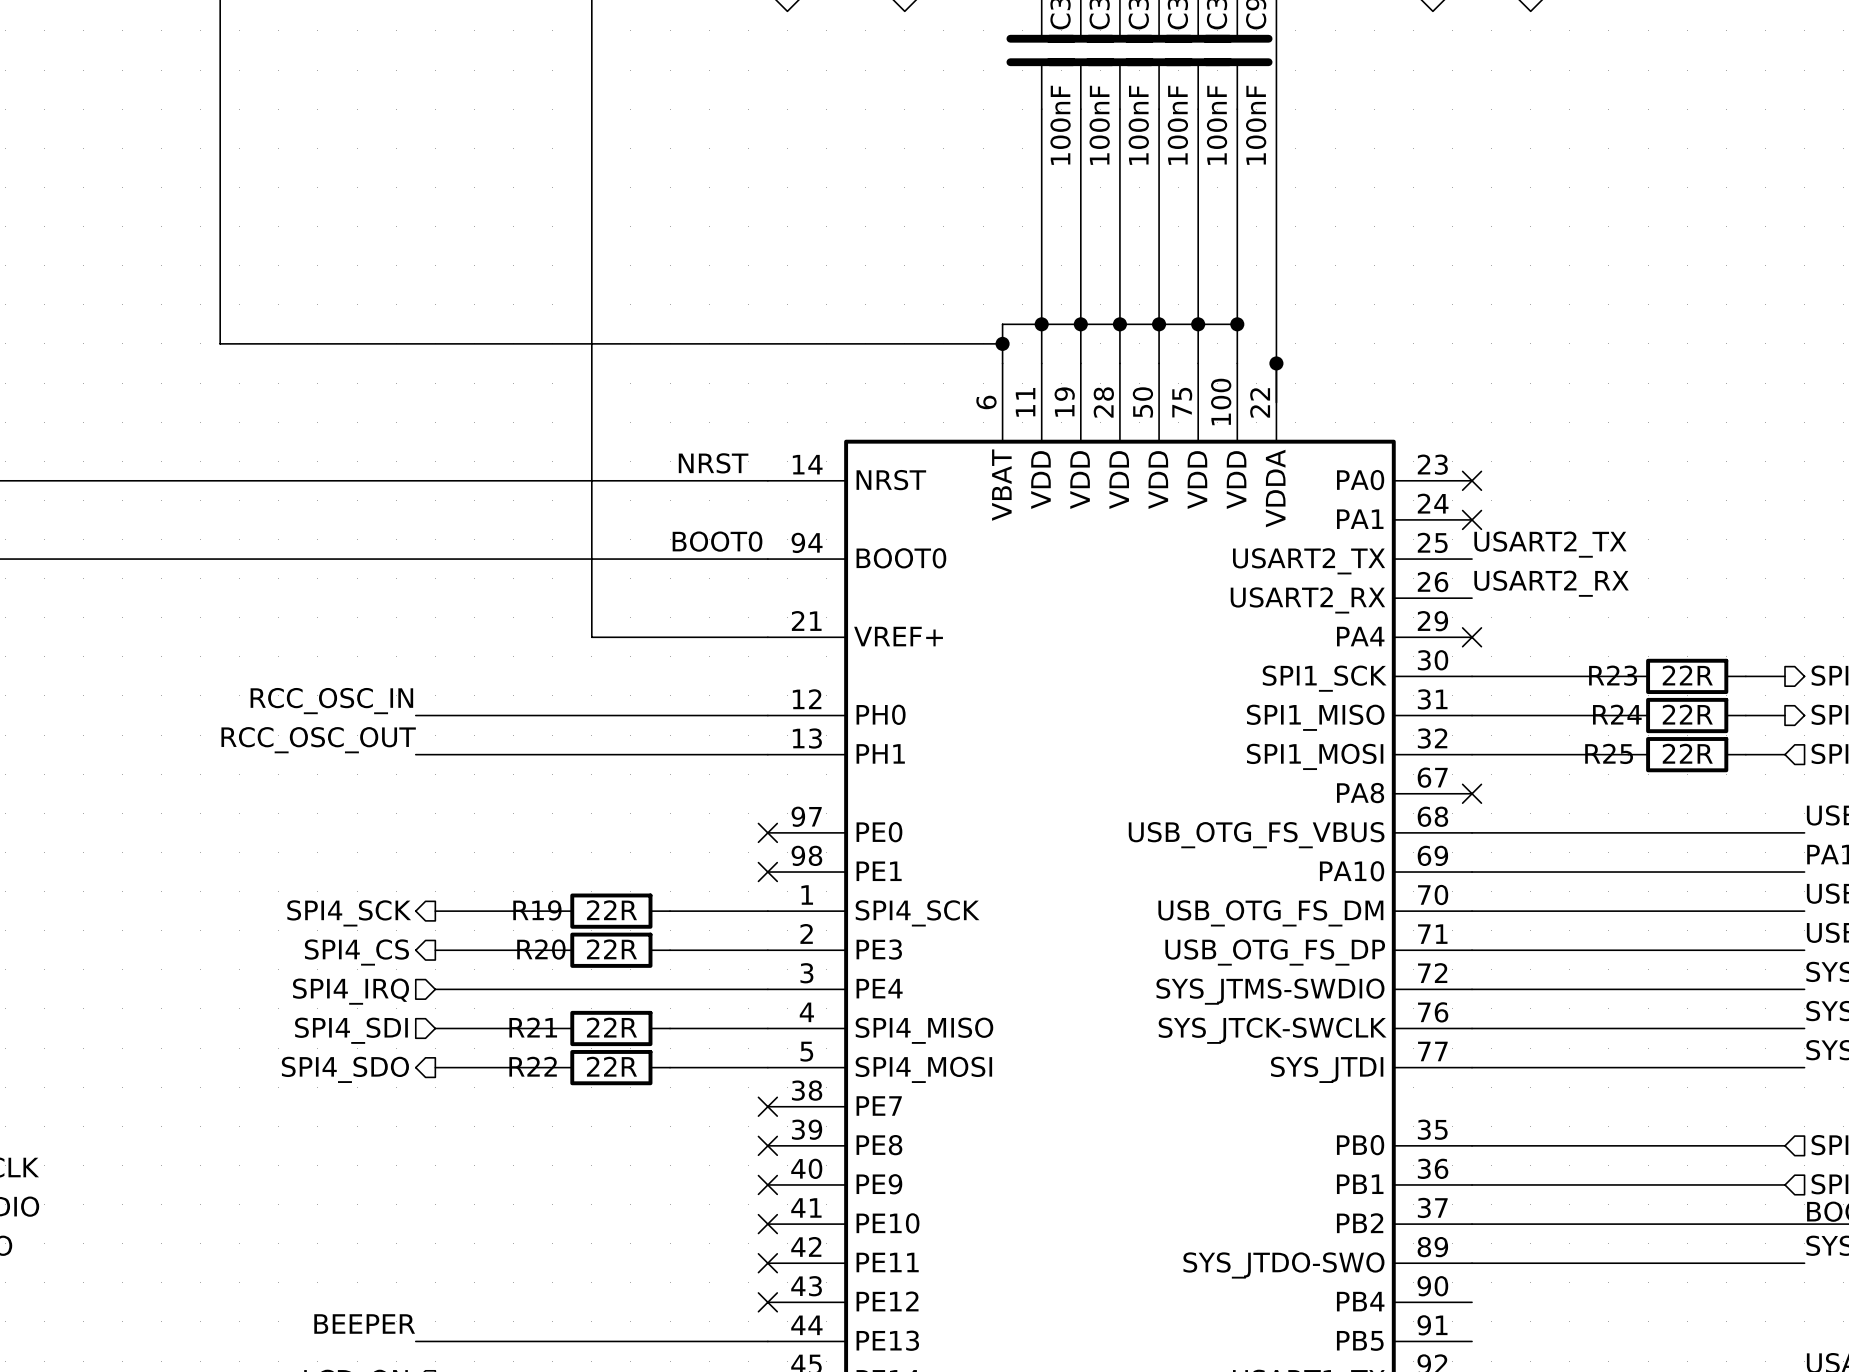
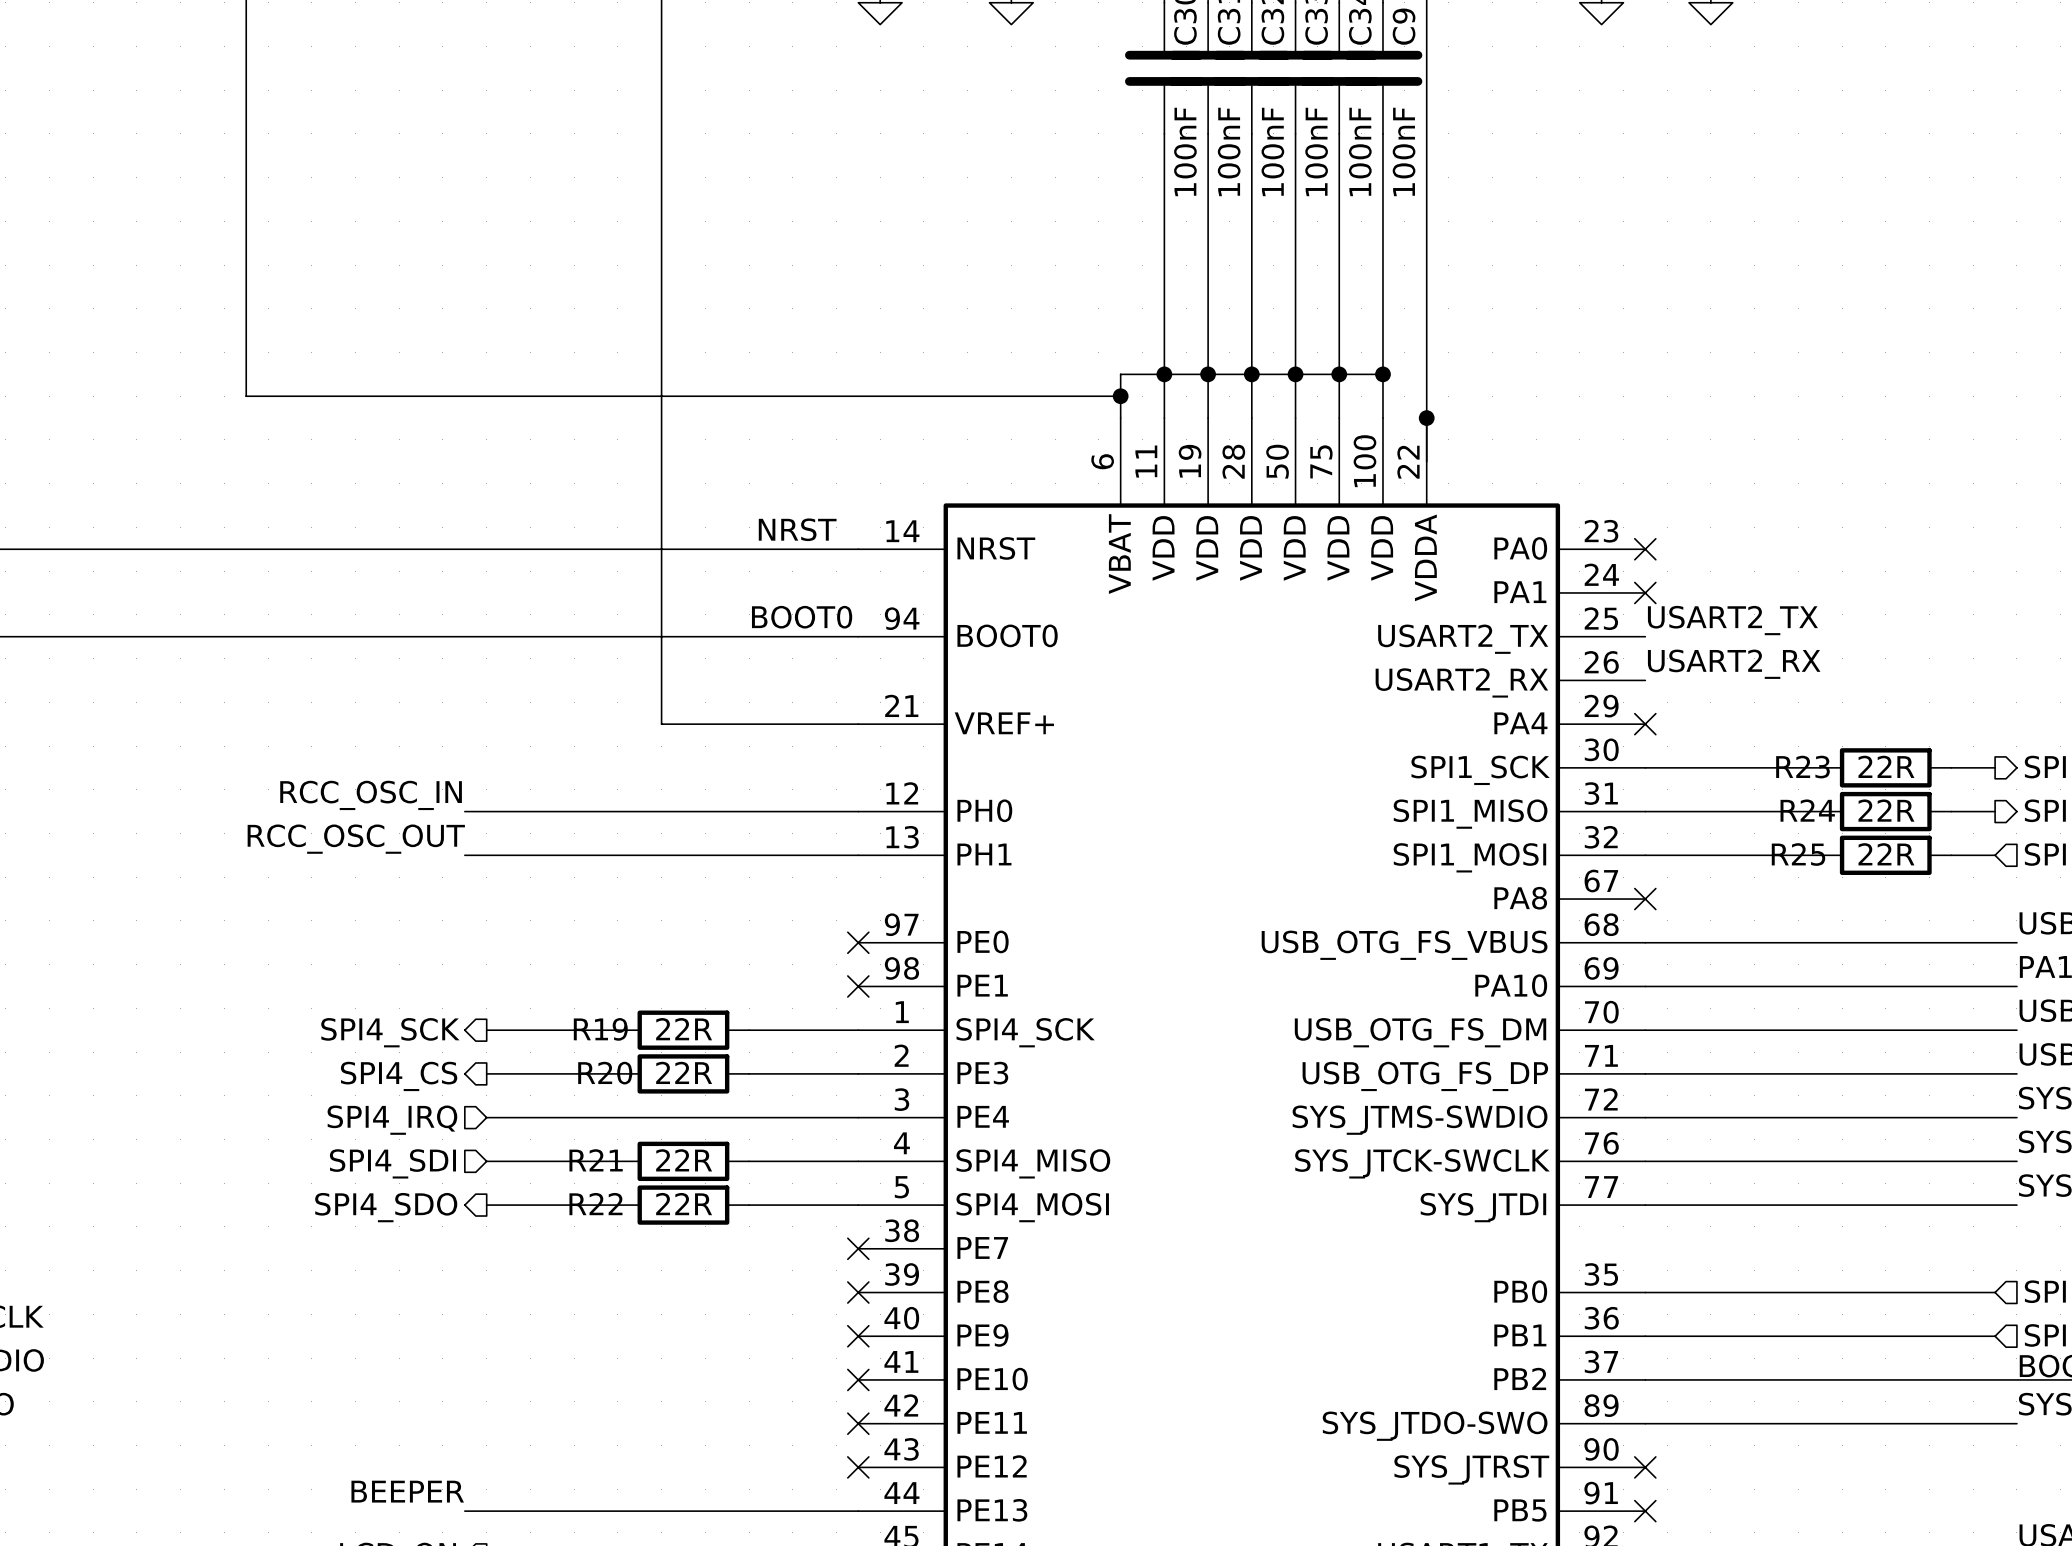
part pin name: PB4 (1360, 1301) -> SYS_JTRST (1471, 1469)
no-connect mark: none -> (1645, 1467)
no-connect mark: none -> (1645, 1511)

